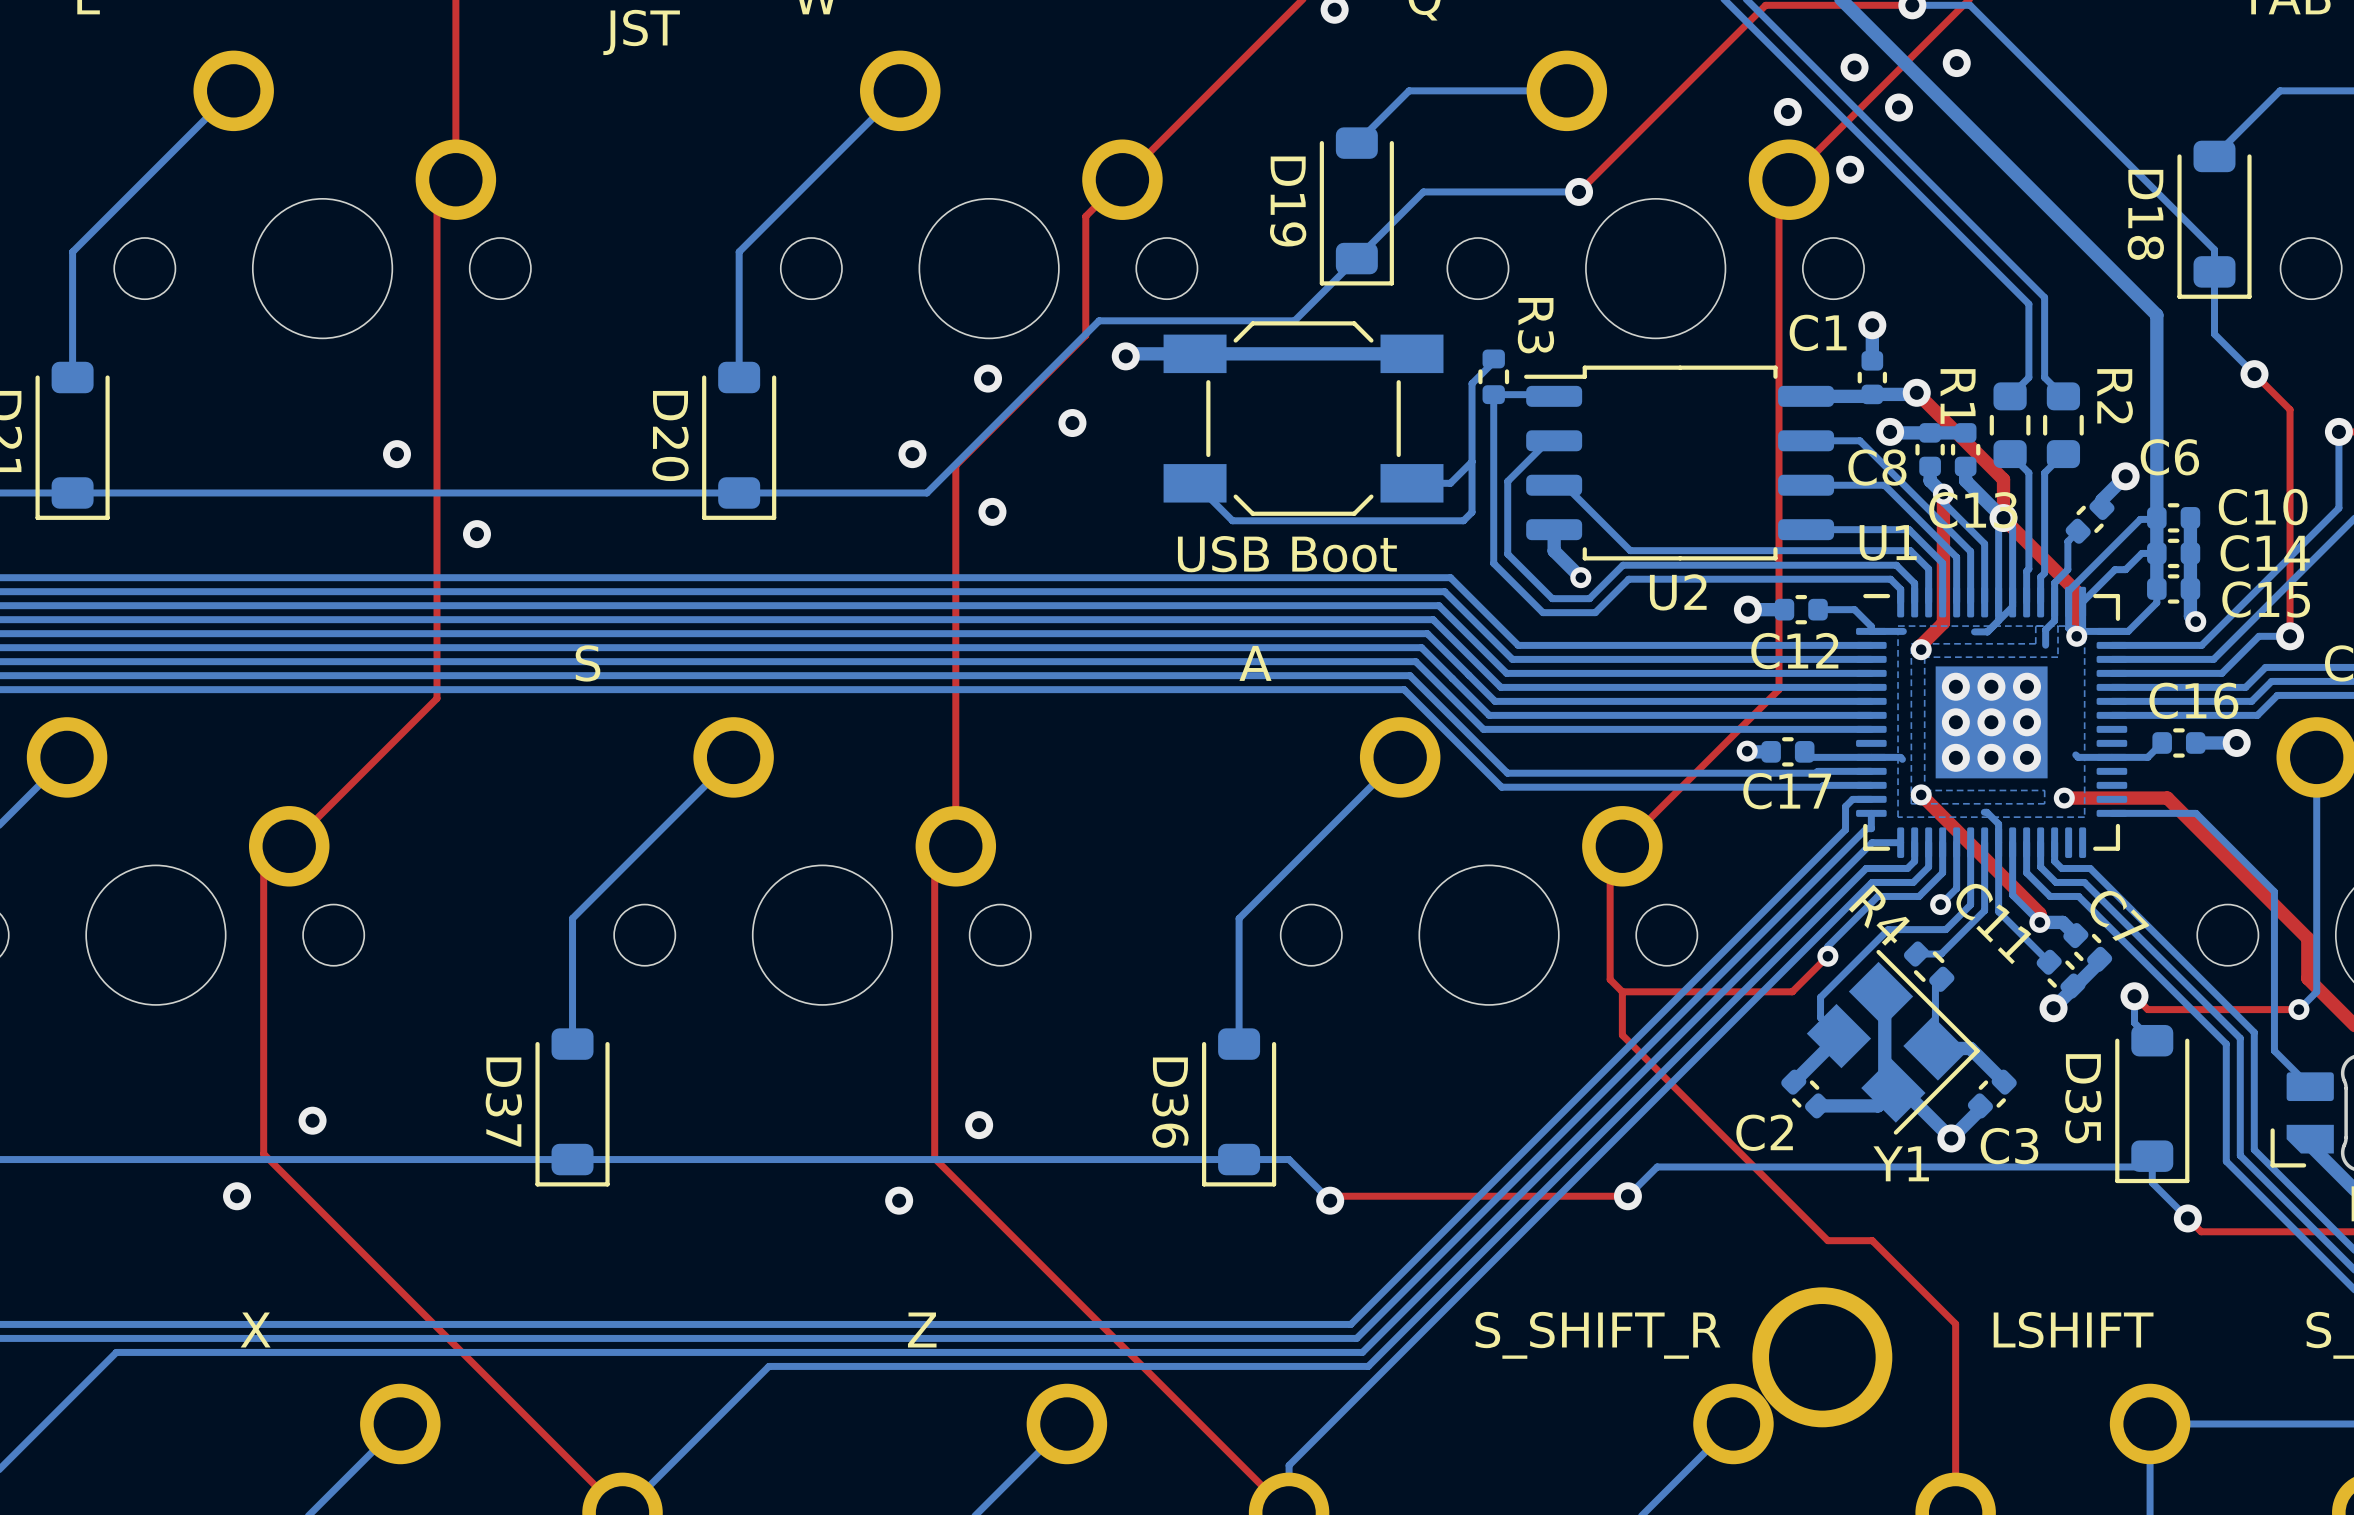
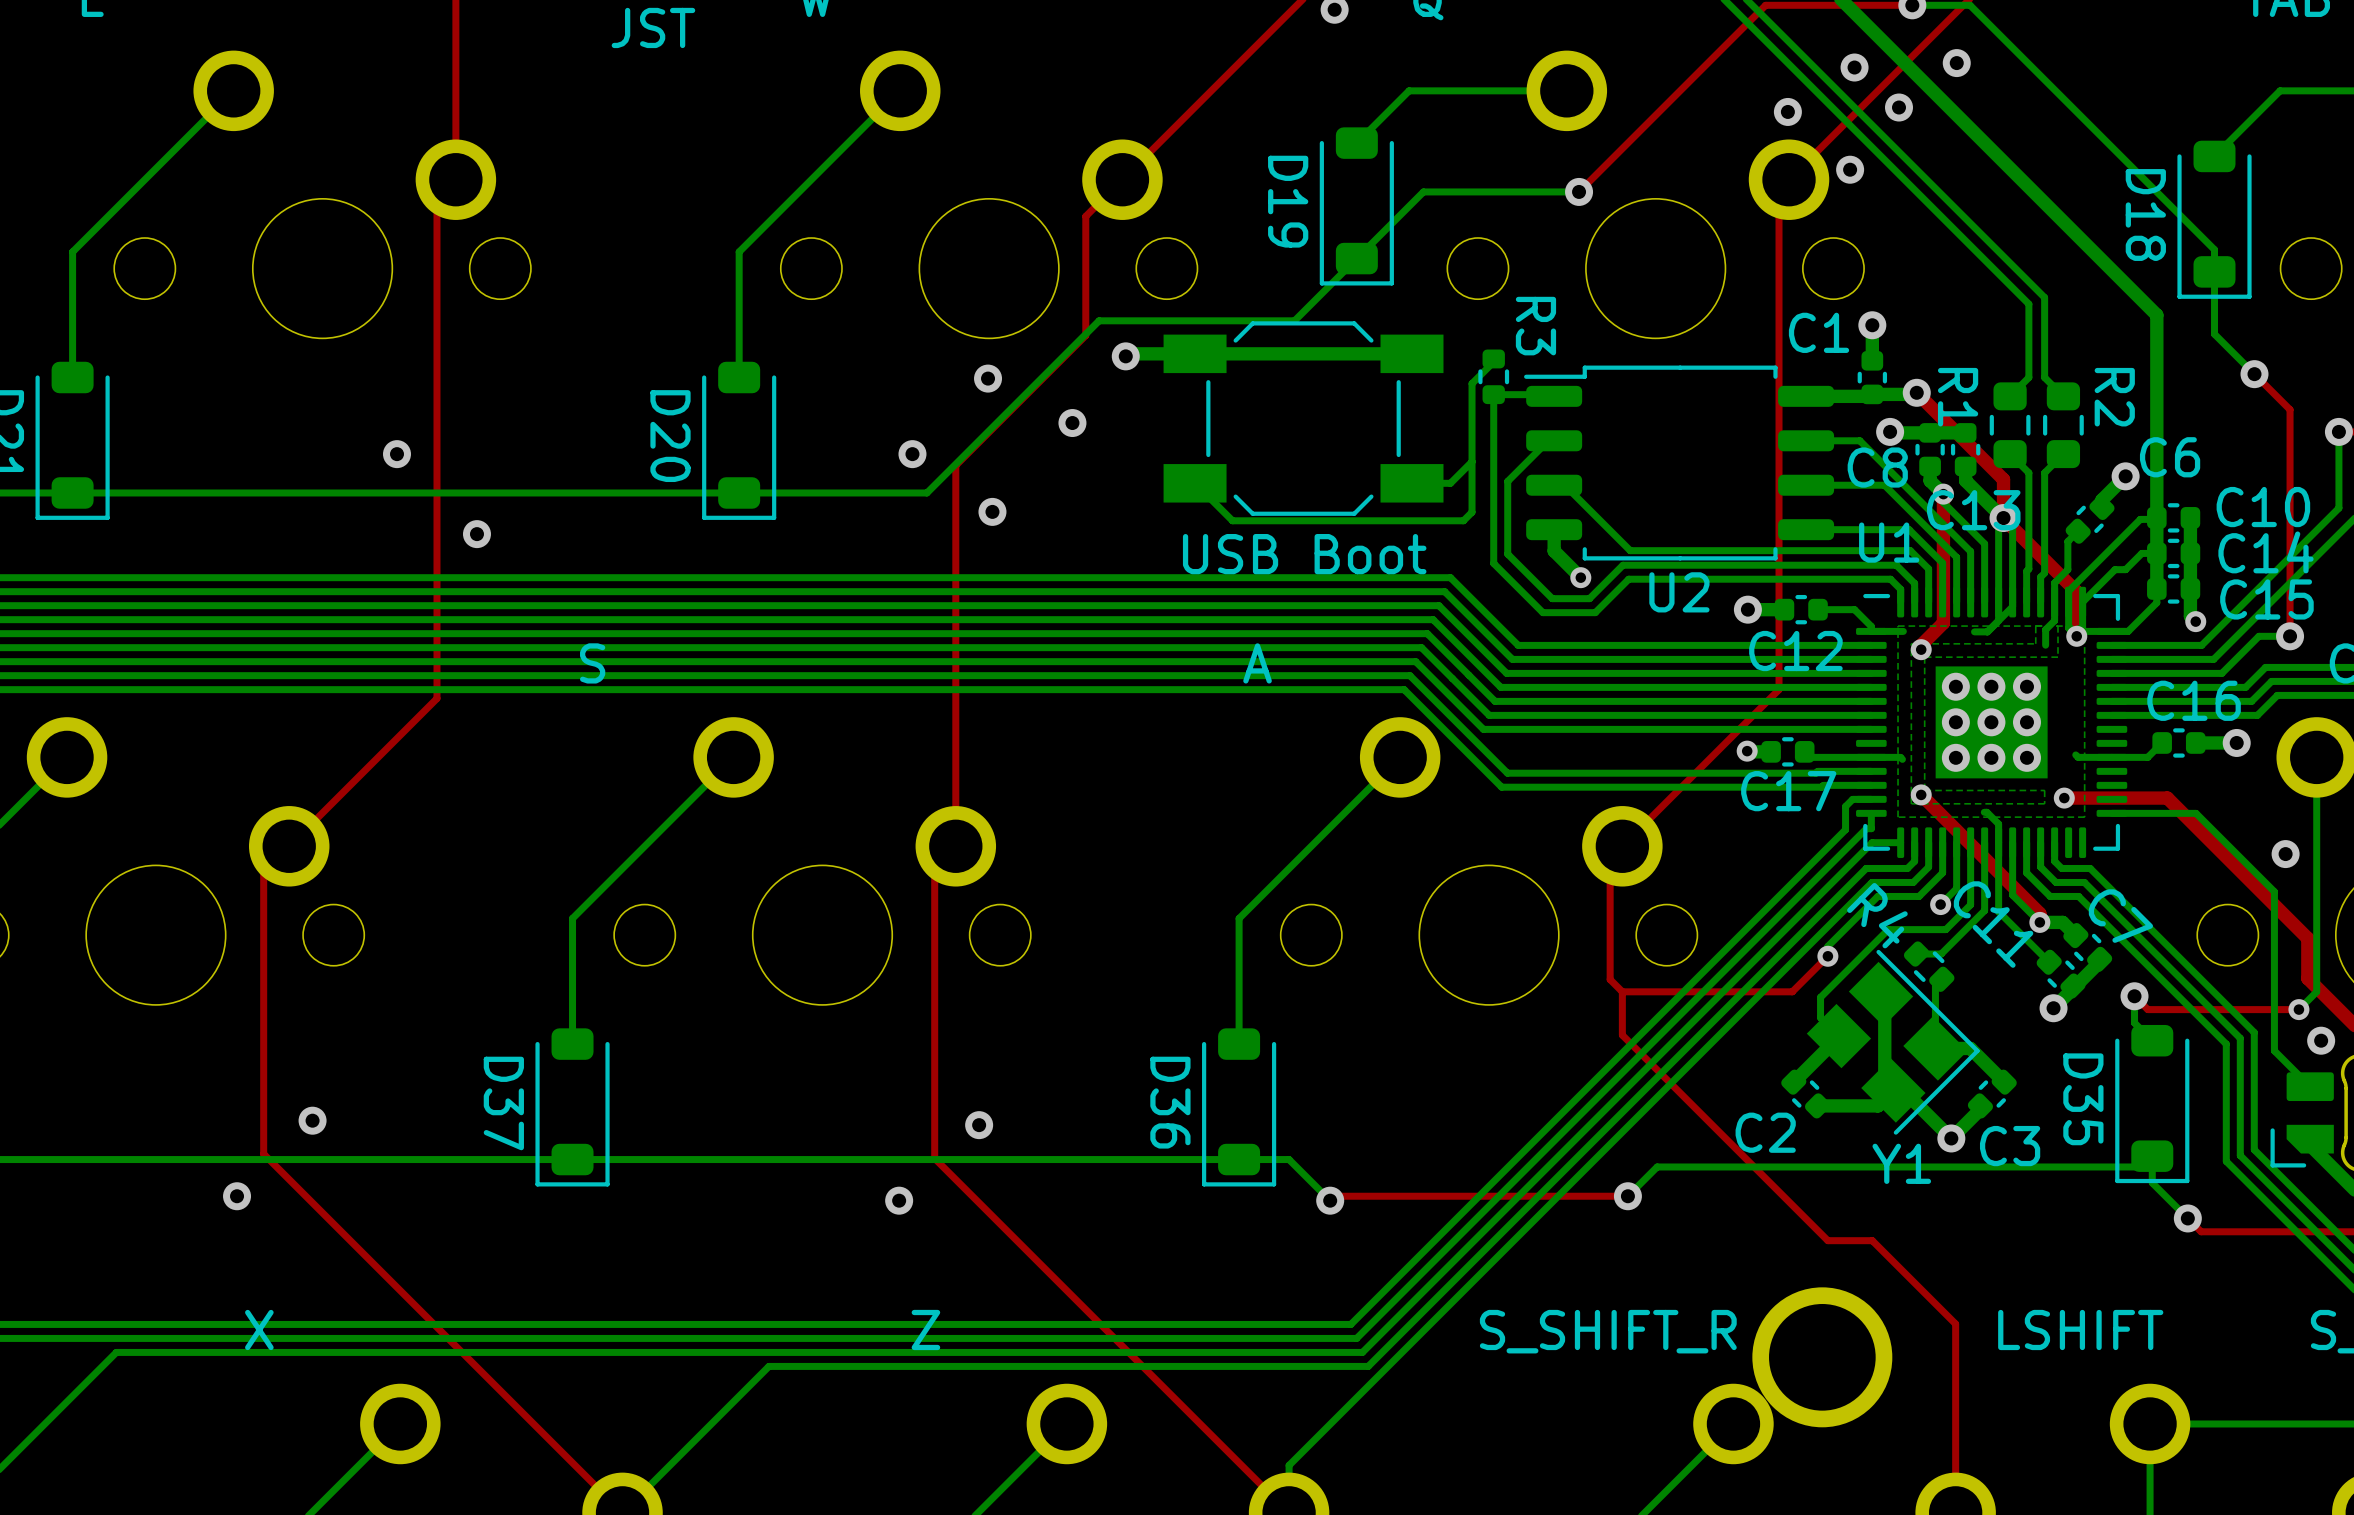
via: none -> (2285, 854)
via: none -> (2321, 1040)

